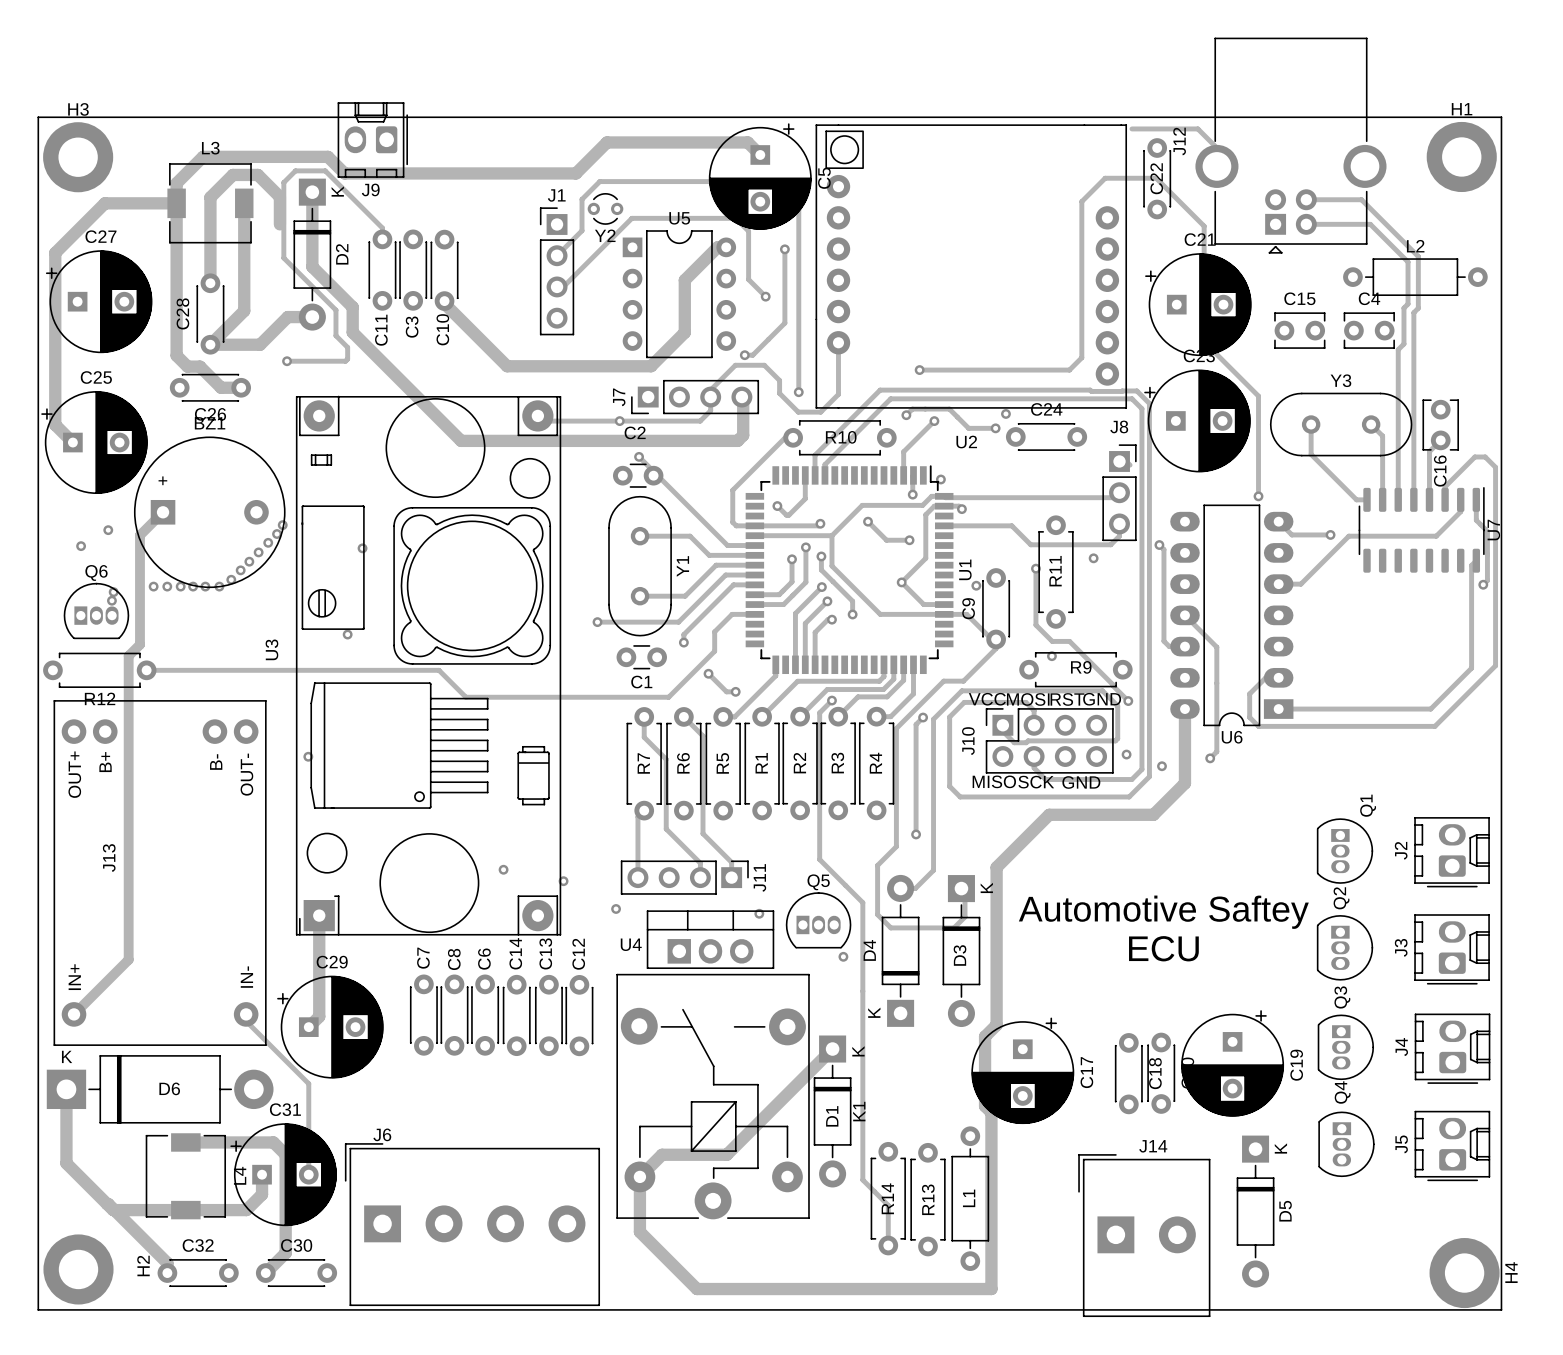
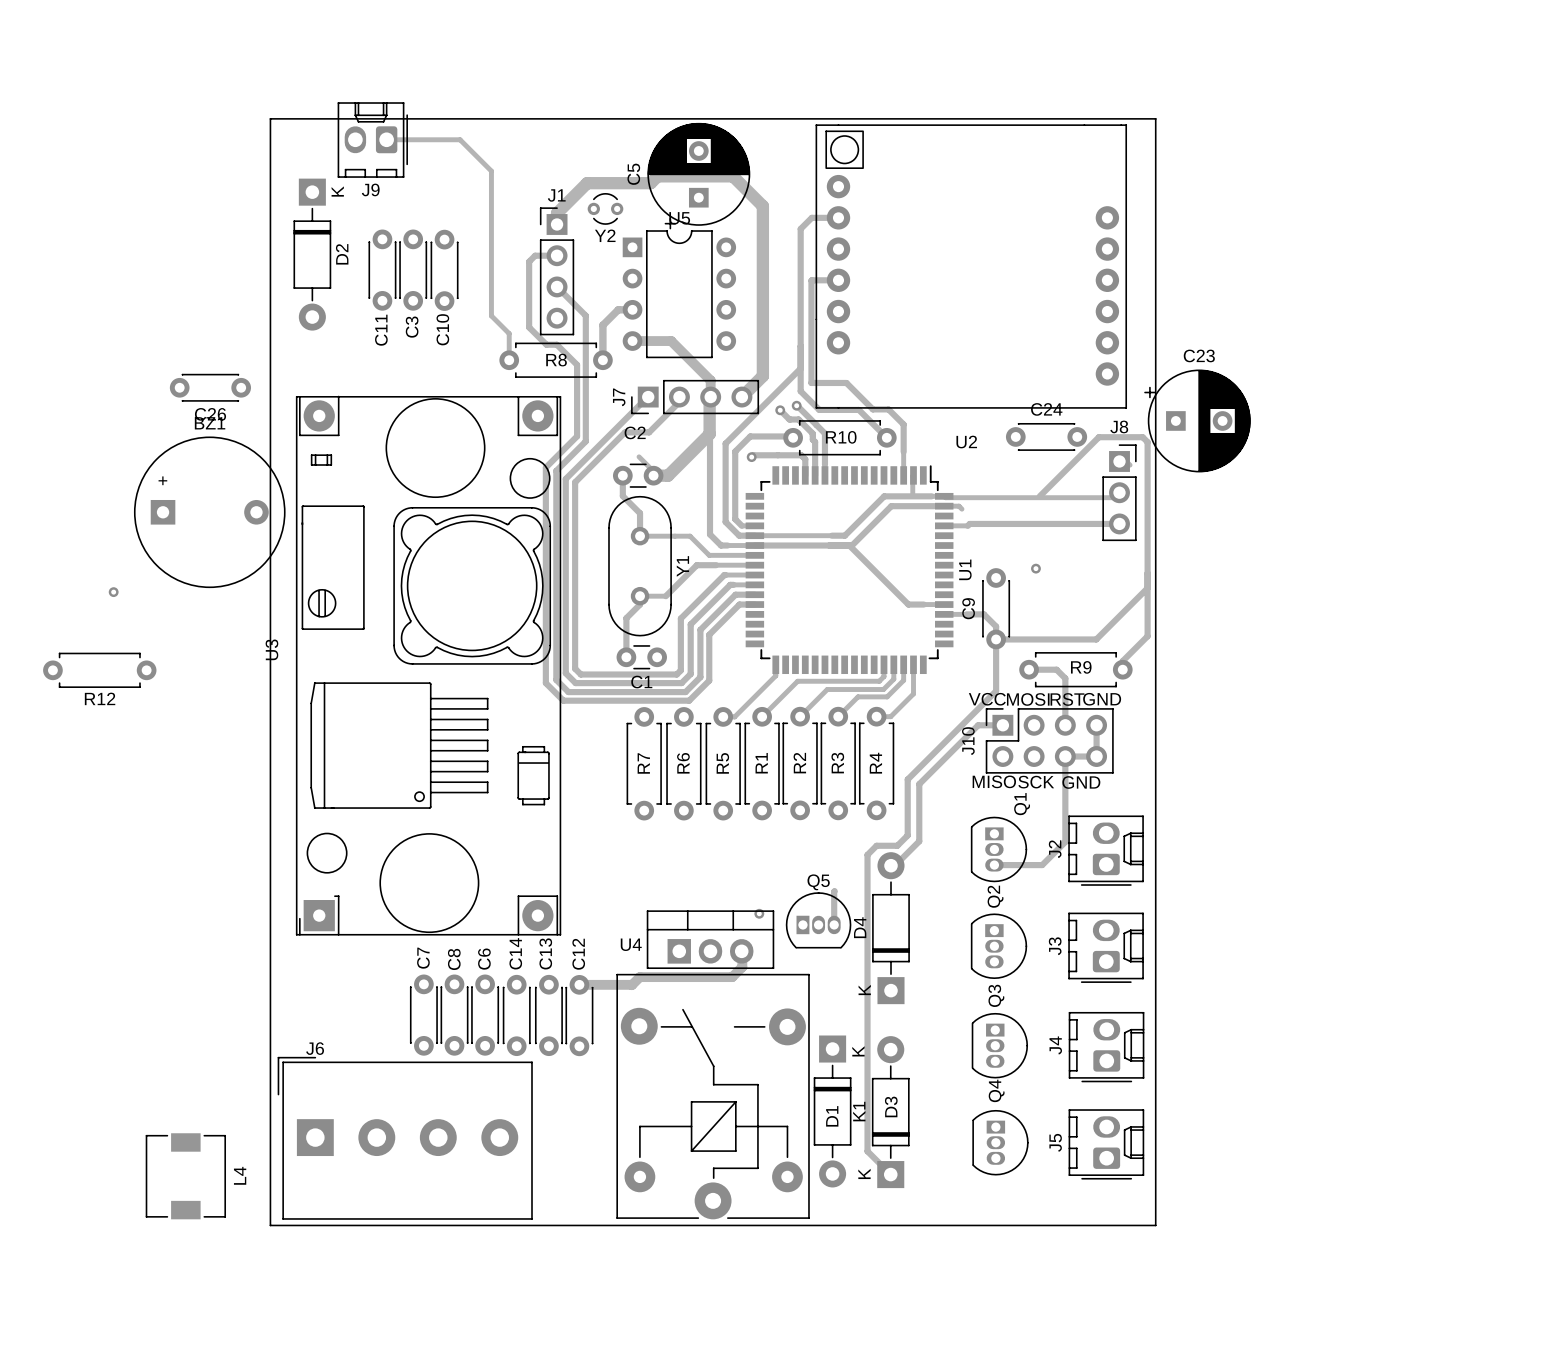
board edge: (38, 117) (38, 1309) (1501, 1309) (1501, 117) (38, 117) -> (270, 118) (270, 1225) (1155, 1225) (1155, 118) (270, 118)
track: (1131, 128) (1197, 128) (1216, 148) (1216, 166) -> none
track: none -> (386, 139) (460, 139) (491, 171) (491, 315) (509, 333) (509, 360)
J12: (1290, 145) -> none
track: (760, 154) (747, 142) (606, 142) (575, 173) (344, 173) (327, 156) (203, 156) (176, 183) (176, 355) (187, 366) (199, 366) (221, 387) (241, 387) -> none
H1: (1461, 156) -> none
H3: (78, 157) -> none
C5 rotation: 0° (760, 176) -> 180° (698, 176)
C22: (1157, 178) -> none
track: (312, 192) (312, 266) (352, 307) (352, 332) (461, 440) (737, 440) (743, 435) (741, 397) -> (557, 224) (557, 213) (587, 183) (650, 183) (657, 176) (733, 176) (762, 206) (762, 376) (741, 397)
track: (1306, 199) (1361, 199) (1418, 256) (1418, 308) (1413, 312) (1413, 499) -> none
track: (176, 203) (104, 203) (55, 253) (55, 424) (72, 442) -> none
L3: (210, 203) -> none
track: (244, 203) (244, 310) (210, 344) (260, 344) (287, 317) (312, 317) -> none
track: none -> (838, 217) (811, 217) (800, 228) (800, 391) (819, 409) (858, 409) (886, 437)
track: (279, 224) (279, 196) (257, 174) (232, 174) (210, 197) (210, 283) -> none
track: (1306, 224) (1370, 224) (1408, 261) (1408, 304) (1403, 308) (1403, 344) (1398, 349) (1398, 499) -> none
track: (382, 239) (382, 228) (325, 170) (295, 170) (283, 182) (283, 258) (335, 310) (335, 335) (347, 347) (347, 359) (345, 361) (287, 361) -> none
track: (726, 247) (717, 247) (684, 280) (684, 332) (651, 366) (507, 366) (444, 303) (444, 301) -> none
track: (784, 249) (784, 323) (752, 355) (744, 355) -> none
via: (784, 249) -> none
track: (557, 255) (582, 230) (582, 199) (599, 181) (772, 181) (798, 207) (798, 392) -> (557, 255) (535, 255) (529, 261) (529, 327) (546, 344) (556, 344) (577, 364) (577, 436) (545, 467) (545, 683) (563, 700) (689, 700) (709, 680) (709, 634) (739, 604) (754, 604)
L2: (1415, 277) -> none
track: (557, 286) (563, 286) (631, 218) (735, 218) (748, 231) (748, 279) (765, 296) -> (557, 286) (585, 315) (585, 441) (556, 470) (556, 679) (568, 692) (685, 692) (700, 677) (700, 629) (735, 594) (754, 594)
via: (765, 296) -> none
C27: (99, 301) -> none
C21: (1198, 304) -> none
track: none -> (632, 309) (618, 309) (602, 325) (602, 360)
C28: (210, 314) -> none
C15: (1299, 330) -> none
C4: (1369, 330) -> none
track: (838, 342) (838, 394) (820, 412) (798, 412) (779, 393) (779, 380) (764, 365) (735, 365) (710, 390) -> (632, 341) (671, 341) (710, 380) (710, 390)
via: (744, 355) -> none
R8: none -> (556, 360)
via: (287, 361) -> none
track: none -> (800, 368) (725, 443) (725, 522) (739, 535) (754, 535)
track: (919, 370) (1069, 370) (1081, 357) (1081, 201) (1105, 178) (1156, 178) (1204, 226) (1204, 341) (1258, 396) (1258, 496) -> none
via: (919, 370) -> none
via: (798, 392) -> none
track: (710, 397) (710, 410) (700, 421) (543, 421) (537, 415) -> (710, 397) (709, 434)
via: none -> (796, 405)
via: none -> (780, 410)
via: (1005, 413) -> none
track: (906, 415) (912, 409) (949, 409) (968, 428) (995, 428) -> none
via: (906, 415) -> none
via: (619, 421) -> none
track: (934, 421) (903, 451) -> (838, 280) (811, 280) (811, 382) (846, 382) (872, 409) (888, 409) (903, 424) (903, 451)
via: (934, 421) -> none
track: (1311, 424) (1311, 454) (1356, 499) (1367, 499) -> none
Y3: (1341, 424) -> none
track: (1371, 424) (1382, 436) (1382, 499) -> none
C16: (1440, 425) -> none
via: (995, 428) -> none
track: none -> (709, 434) (668, 475) (657, 475)
track: (793, 437) (785, 437) (732, 490) (732, 522) (736, 525) (741, 525) -> (793, 437) (750, 436) (735, 451) (735, 519) (741, 525)
track: (1440, 440) (1429, 451) (1429, 499) -> none
C25: (94, 442) -> none
via: (639, 456) -> none
via: none -> (751, 457)
track: (824, 464) (890, 398) (1131, 398) (1141, 408) (1141, 769) (1131, 779) (1045, 779) (1034, 767) (1034, 756) -> (824, 464) (824, 433) (796, 405)
track: none -> (622, 475) (622, 496) (640, 513) (640, 536)
track: (657, 475) (727, 545) -> (709, 434) (710, 534) (721, 545) (727, 545)
track: (805, 475) (805, 498) (788, 515) (786, 515) (777, 506) -> (805, 475) (805, 459) (801, 455) (753, 455) (751, 457)
track: (815, 475) (815, 455) (880, 390) (1136, 390) (1149, 403) (1149, 776) (1129, 796) (960, 796) (949, 786) (949, 717) (964, 702) (1025, 702) (1034, 710) (1034, 725) -> (815, 475) (815, 441) (812, 439) (812, 433) (798, 419) (789, 419) (780, 410)
via: (940, 479) -> none
via: (912, 494) -> none
track: (931, 496) (922, 505) (862, 505) (831, 535) (831, 566) (880, 614) (944, 614) -> (931, 496) (884, 496) (844, 535) (831, 535)
track: none -> (1039, 496) (1098, 437) (1142, 437) (1147, 442) (1147, 636) (1122, 661) (1122, 669)
via: (1258, 496) -> none
track: (1445, 499) (1445, 486) (1474, 456) (1485, 456) (1495, 467) (1495, 665) (1434, 726) (1258, 726) (1249, 717) (1249, 693) (1265, 677) (1278, 677) -> none
track: (1460, 499) (1460, 511) (1436, 536) (1348, 536) (1300, 584) (1278, 584) -> none
track: (1476, 499) (1476, 520) (1487, 531) (1487, 580) (1483, 584) -> none
via: (777, 506) -> none
track: (934, 506) (925, 514) (925, 558) (901, 582) (923, 604) -> (849, 545) (908, 604) (923, 604)
track: none -> (934, 506) (891, 506) (852, 545) (754, 545)
via: (961, 509) -> none
track: (163, 512) (139, 535) (139, 644) (128, 655) (128, 959) (74, 1014) -> none
track: (868, 521) (886, 540) (909, 540) -> none
via: (868, 521) -> none
track: (1278, 521) (1291, 534) (1330, 534) -> none
track: (820, 523) (818, 525) (754, 525) -> none
via: (820, 523) -> none
track: (1119, 523) (1119, 536) (1110, 544) (1030, 544) (1011, 525) (967, 525) -> (1119, 523) (969, 523) (967, 525)
via: (282, 525) -> none
U7: (1421, 529) -> none
via: (108, 530) -> none
via: (277, 534) -> none
via: (1330, 534) -> none
via: (909, 540) -> none
via: (268, 542) -> none
track: (1159, 545) (1163, 549) (1163, 641) (1169, 646) (1184, 646) -> none
via: (1159, 545) -> none
via: (81, 546) -> none
track: (805, 547) (805, 582) (783, 604) (754, 604) -> none
via: (805, 547) -> none
via: (362, 548) -> none
via: (258, 552) -> none
track: (821, 556) (821, 569) (852, 601) (852, 614) -> none
via: (821, 556) -> none
via: (1093, 558) -> none
track: (792, 559) (792, 581) (779, 594) (754, 594) -> none
via: (792, 559) -> none
track: (1476, 560) (1471, 565) (1471, 668) (1430, 709) (1278, 709) -> none
via: (249, 561) -> none
track: (716, 565) (685, 596) (665, 596) -> (716, 565) (696, 565) (665, 596)
track: (1035, 568) (1035, 625) (1052, 641) (1069, 641) (1128, 701) -> none
via: (240, 570) -> none
R11: (1056, 572) -> none
track: (725, 575) (678, 622) (597, 622) -> (725, 575) (680, 618) (680, 670) (676, 674) (580, 674) (575, 668) (575, 482) (625, 432) (649, 432) (678, 403)
via: (231, 579) -> none
via: (901, 582) -> none
track: (733, 584) (683, 634) (683, 642) -> (733, 584) (730, 584) (690, 624) (690, 674) (681, 683) (575, 683) (565, 673) (565, 479) (648, 396)
via: (1483, 584) -> none
via: (976, 585) -> none
via: (153, 586) -> none
via: (167, 586) -> none
via: (180, 586) -> none
via: (193, 586) -> none
via: (205, 586) -> none
via: (219, 586) -> none
track: (821, 587) (795, 613) (795, 664) -> none
via: (821, 587) -> none
track: none -> (640, 596) (640, 604) (626, 618) (626, 657)
via: (111, 600) -> none
track: (827, 601) (805, 623) (805, 664) -> none
via: (827, 601) -> none
Q6: (96, 610) -> none
track: (754, 614) (732, 614) (714, 631) (714, 651) (668, 697) (465, 697) (439, 670) (146, 670) -> none
via: (852, 614) -> none
track: (966, 614) (991, 639) (996, 639) -> (966, 614) (983, 614) (996, 626) (996, 639) (1096, 639) (1147, 588)
track: (1184, 615) (1216, 647) (1216, 751) (1210, 758) -> none
U6: (1231, 615) -> none
track: (831, 619) (827, 619) (815, 632) (815, 664) -> none
via: (831, 619) -> none
via: (597, 622) -> none
via: (347, 634) -> none
via: (683, 642) -> none
track: (996, 648) (963, 681) (943, 681) (896, 728) (896, 846) (877, 865) (877, 914) (890, 927) (954, 927) (965, 916) (965, 892) (961, 888) -> (996, 648) (996, 691) (907, 779) (907, 835) (897, 845) (876, 845) (867, 854) (867, 1151) (890, 1174)
via: (1051, 656) -> none
track: none -> (1029, 669) (1056, 669) (1065, 678) (1065, 725)
track: (708, 673) (726, 691) (735, 691) -> none
via: (708, 673) -> none
via: (735, 691) -> none
track: (831, 700) (819, 712) (819, 859) (862, 902) (862, 1179) (888, 1205) (888, 1245) -> none
via: (831, 700) -> none
via: (1128, 701) -> none
track: (1184, 709) (1184, 783) (1153, 814) (1049, 814) (996, 867) (996, 1025) (985, 1036) (985, 1106) (991, 1112) (991, 1289) (696, 1289) (639, 1231) (639, 1176) (662, 1154) (726, 1154) (832, 1049) -> none
track: (644, 716) (644, 737) (666, 759) (666, 829) (700, 863) (700, 877) -> none
track: (683, 716) (703, 736) (703, 833) (731, 862) (731, 877) -> none
track: (923, 717) (916, 724) (916, 834) -> none
via: (923, 717) -> none
track: (1002, 725) (1002, 731) (1014, 742) (1026, 742) (1028, 740) (1115, 740) (1117, 738) (1117, 705) (1102, 690) (961, 690) (933, 719) (933, 870) (915, 888) (900, 888) -> (1002, 725) (978, 725) (919, 784) (919, 841) (894, 865) (890, 865)
track: none -> (1096, 725) (1096, 756) (1065, 756) (1065, 841) (1042, 865) (994, 865)
via: (1126, 754) -> none
via: (308, 756) -> none
via: (1210, 758) -> none
via: (1161, 766) -> none
track: (644, 810) (637, 816) (637, 877) -> none
via: (916, 834) -> none
Q1 position: (1345, 851) -> (999, 849)
J2 position: (1452, 852) -> (1106, 850)
via: (503, 869) -> none
J13: (160, 873) -> none
J11: (684, 877) -> none
via: (563, 881) -> none
track: none -> (834, 891) (834, 924)
via: (616, 908) -> none
text: Automotive Saftey (1163, 912) -> none
track: (319, 915) (319, 1016) (308, 1027) -> none
Q2 position: (1345, 947) -> (999, 946)
text: ECU (1163, 948) -> none
J3 position: (1452, 949) -> (1106, 947)
D4 position: (900, 950) -> (890, 928)
track: none -> (741, 951) (742, 967) (732, 977) (639, 977) (631, 985)
D3 rotation: 0° (961, 951) -> 180° (890, 1112)
D3 position: (961, 951) -> (890, 1112)
via: (843, 956) -> none
track: none -> (579, 984) (632, 984)
track: (246, 1014) (246, 1021) (308, 1083) (308, 1174) -> none
C29: (330, 1027) -> none
Q3 position: (1345, 1047) -> (999, 1045)
J4 position: (1452, 1048) -> (1106, 1047)
C19: (1232, 1063) -> none
C17: (1022, 1070) -> none
C18: (1128, 1073) -> none
part: (1161, 1073) -> none
track: (66, 1089) (66, 1163) (113, 1210) (246, 1210) (262, 1194) (262, 1174) -> none
D6: (160, 1089) -> none
track: (185, 1142) (273, 1142) (285, 1154) (285, 1253) (265, 1273) -> none
Q4 position: (1346, 1144) -> (1000, 1142)
J5 position: (1452, 1145) -> (1106, 1144)
C31: (283, 1174) -> none
R14: (888, 1198) -> none
L1: (970, 1198) -> none
R13: (928, 1199) -> none
track: (107, 1204) (167, 1263) (167, 1273) -> none
D5: (1255, 1211) -> none
J6 position: (472, 1224) -> (405, 1138)
J14: (1144, 1235) -> none
H2: (78, 1269) -> none
C32: (198, 1273) -> none
C30: (296, 1273) -> none
H4: (1464, 1273) -> none

